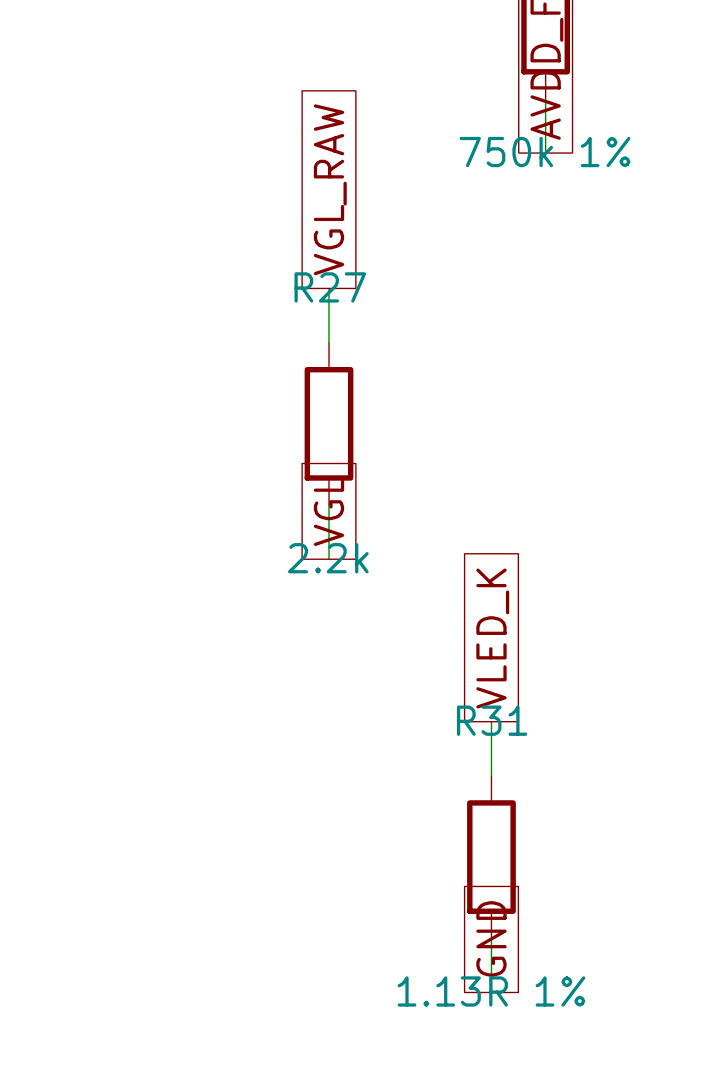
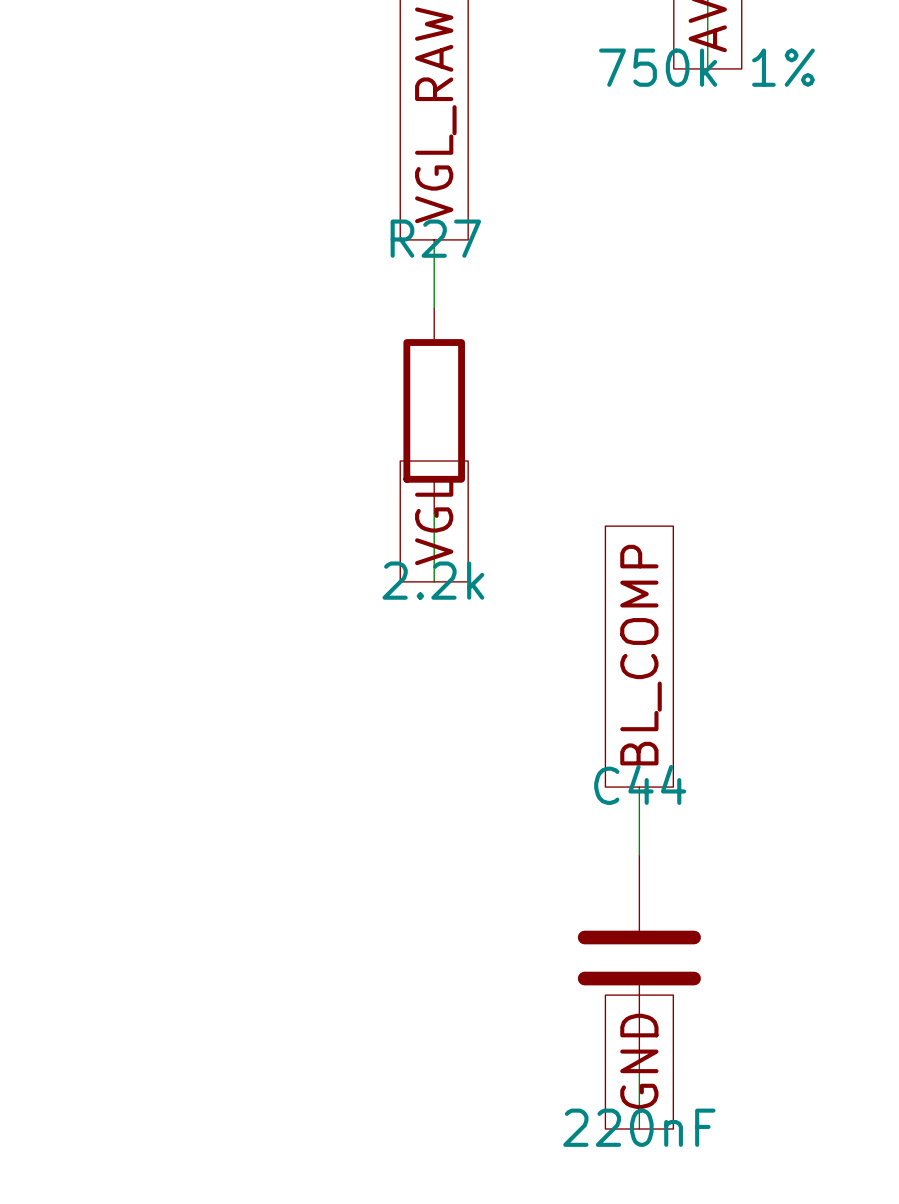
global label: VLED_K (492, 638) -> BL_COMP (641, 655)
R31: 1.13R 1% (491, 857) -> none
C44: none -> 220nF (639, 958)

